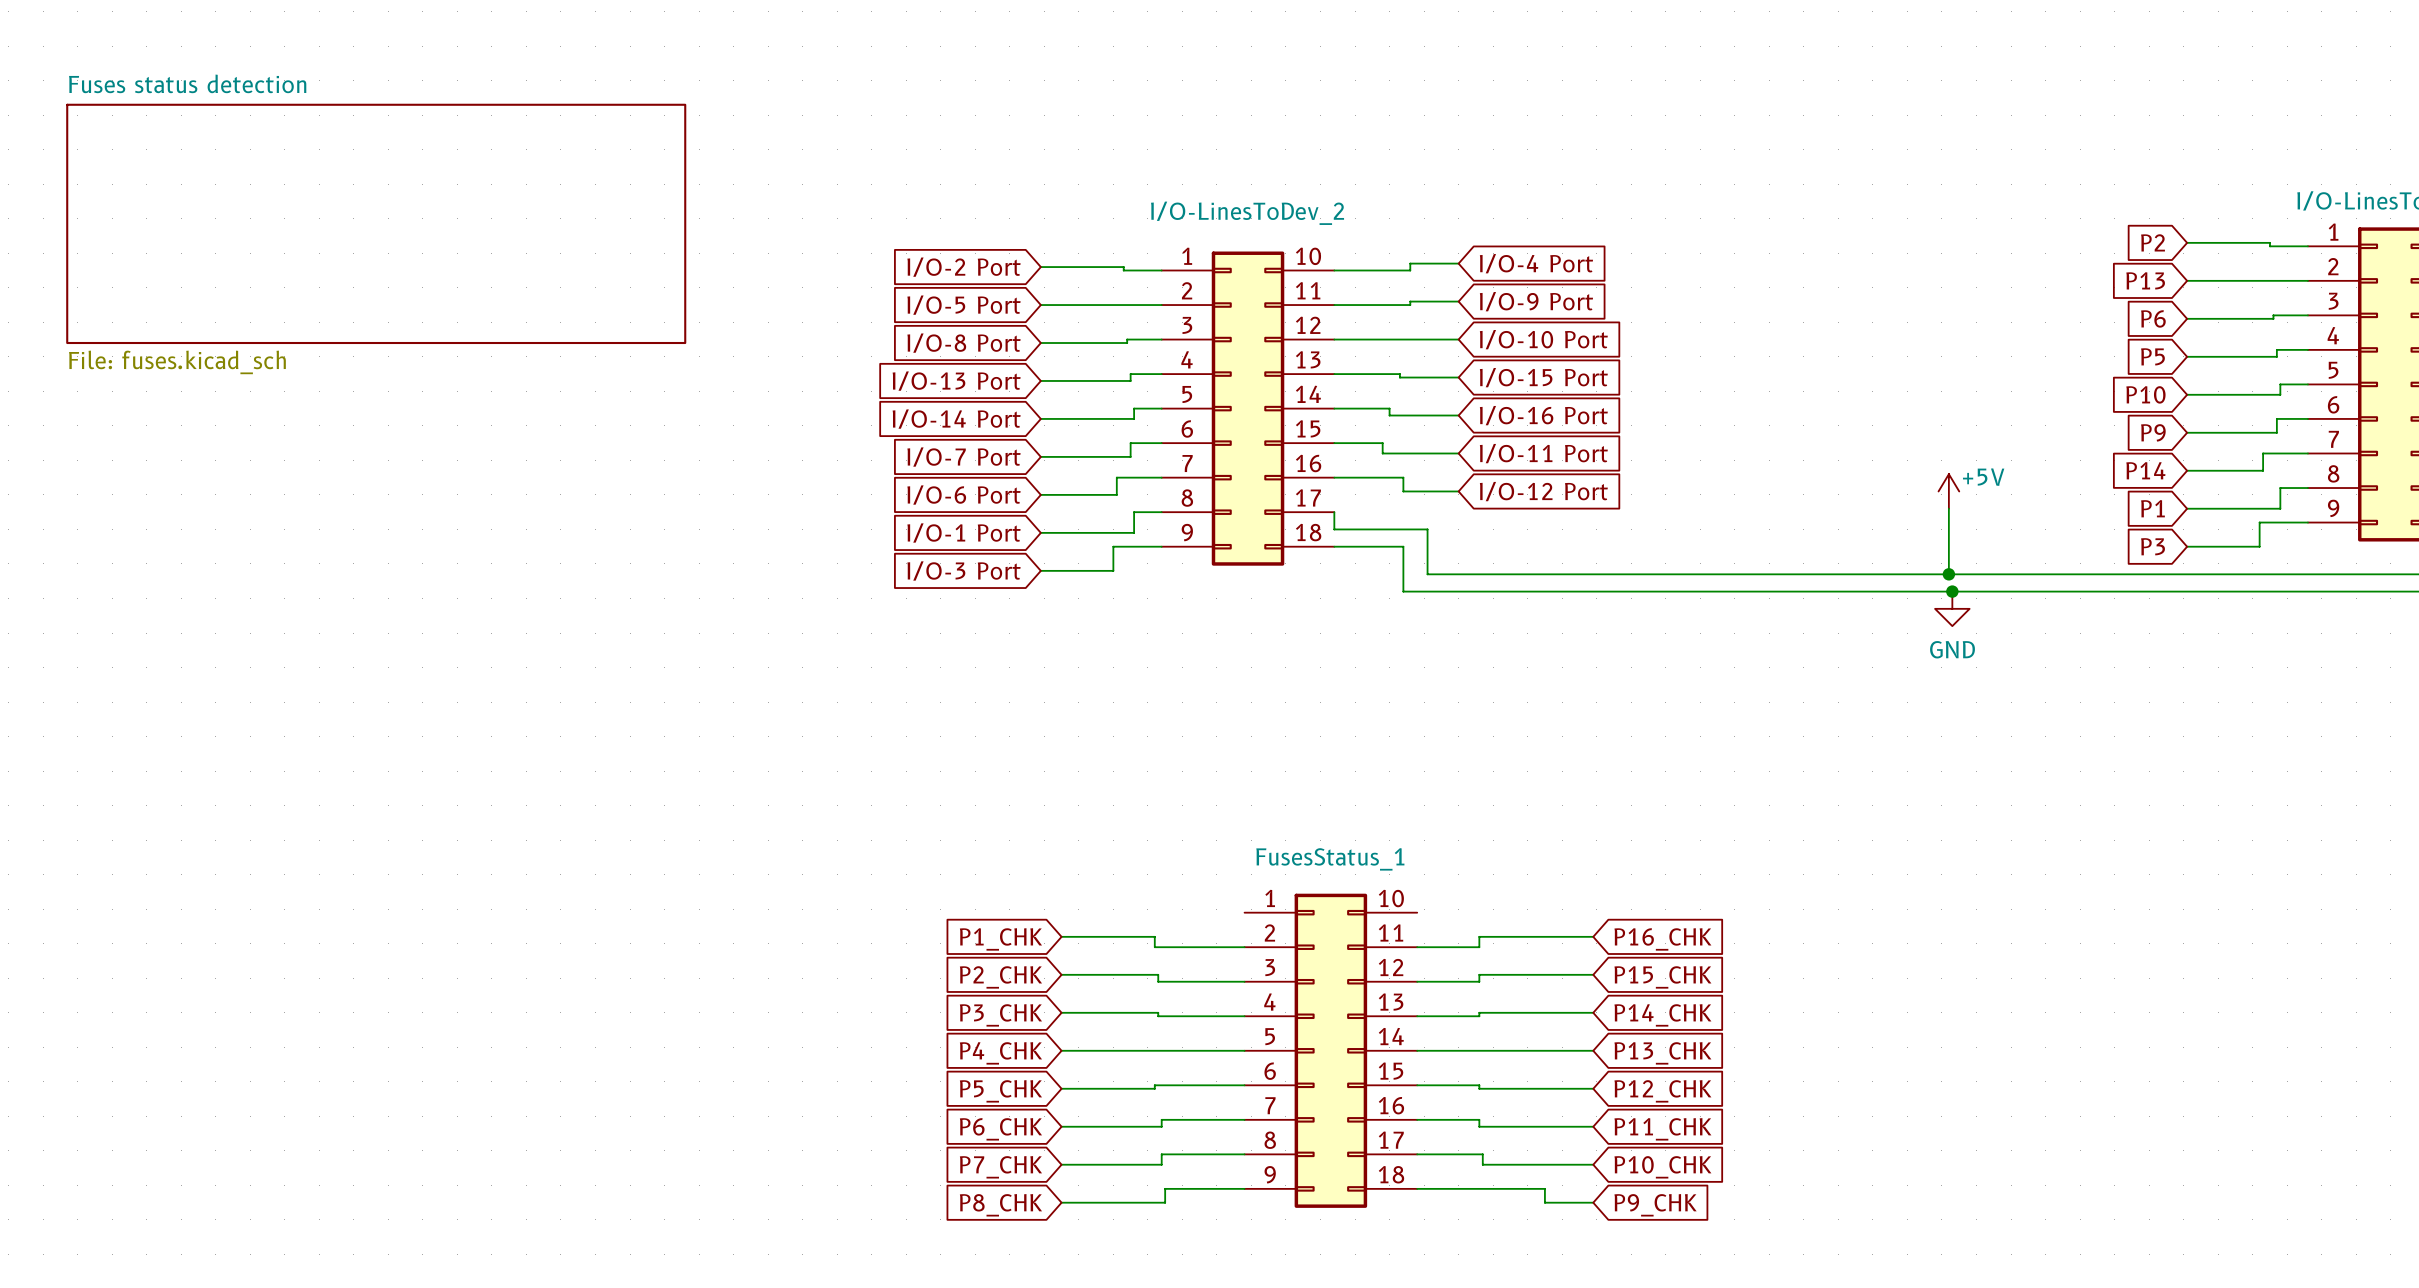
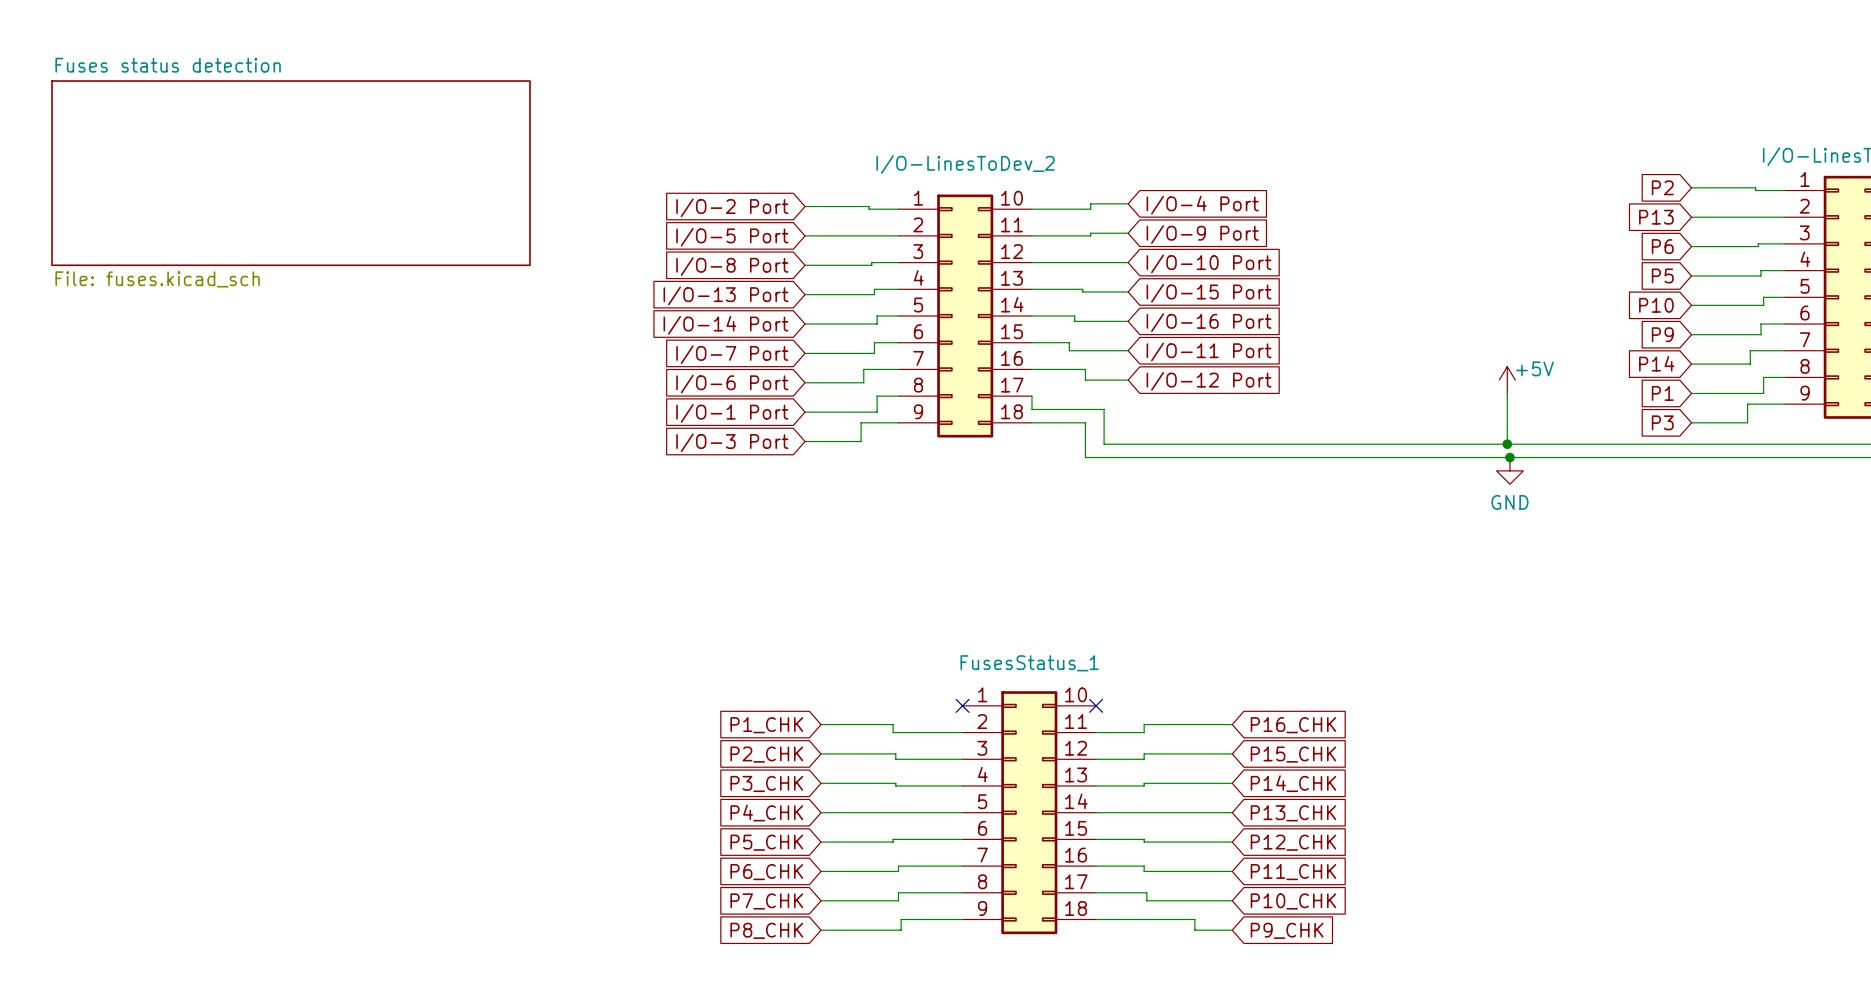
no-connect mark: none -> (962, 705)
no-connect mark: none -> (1096, 705)

